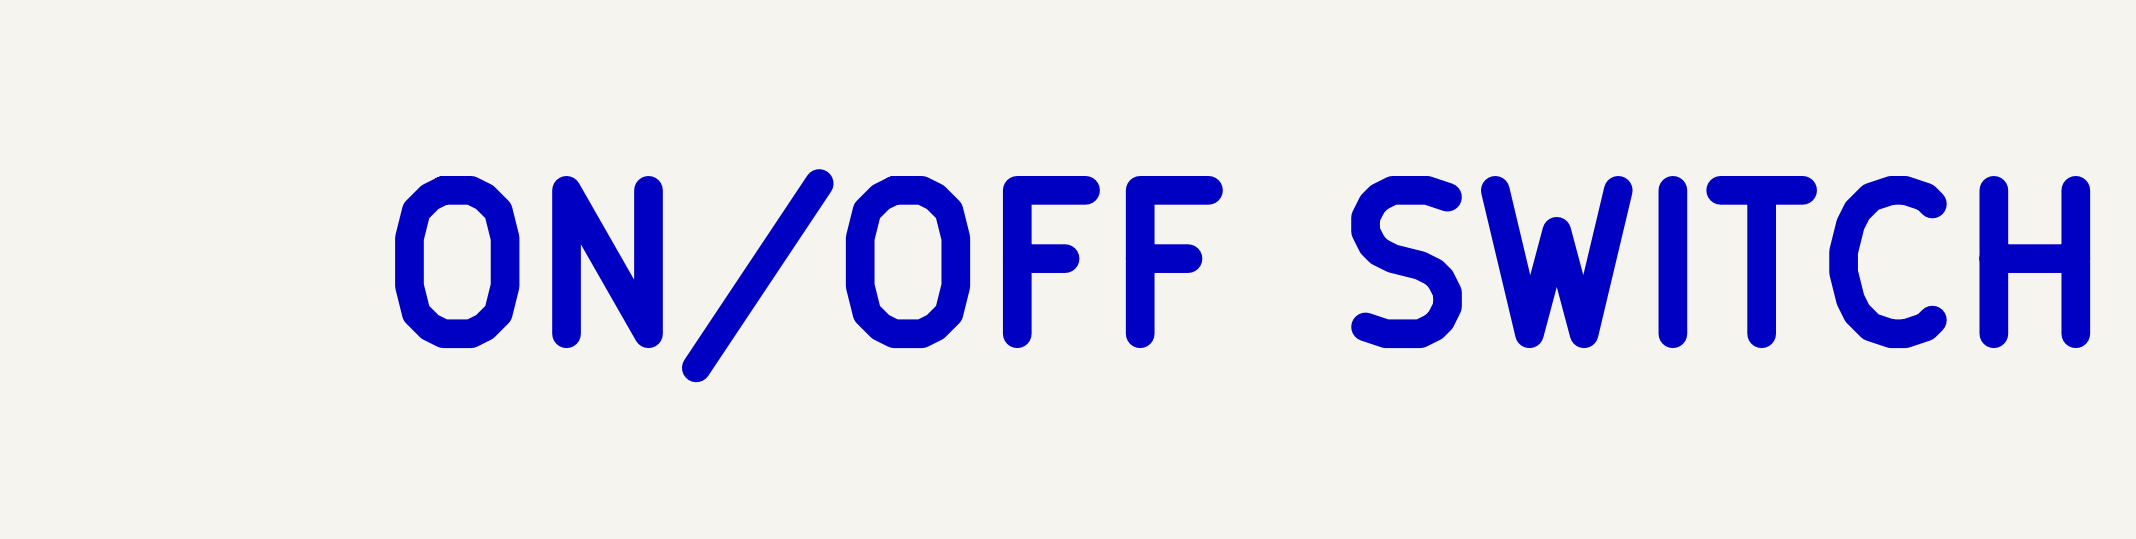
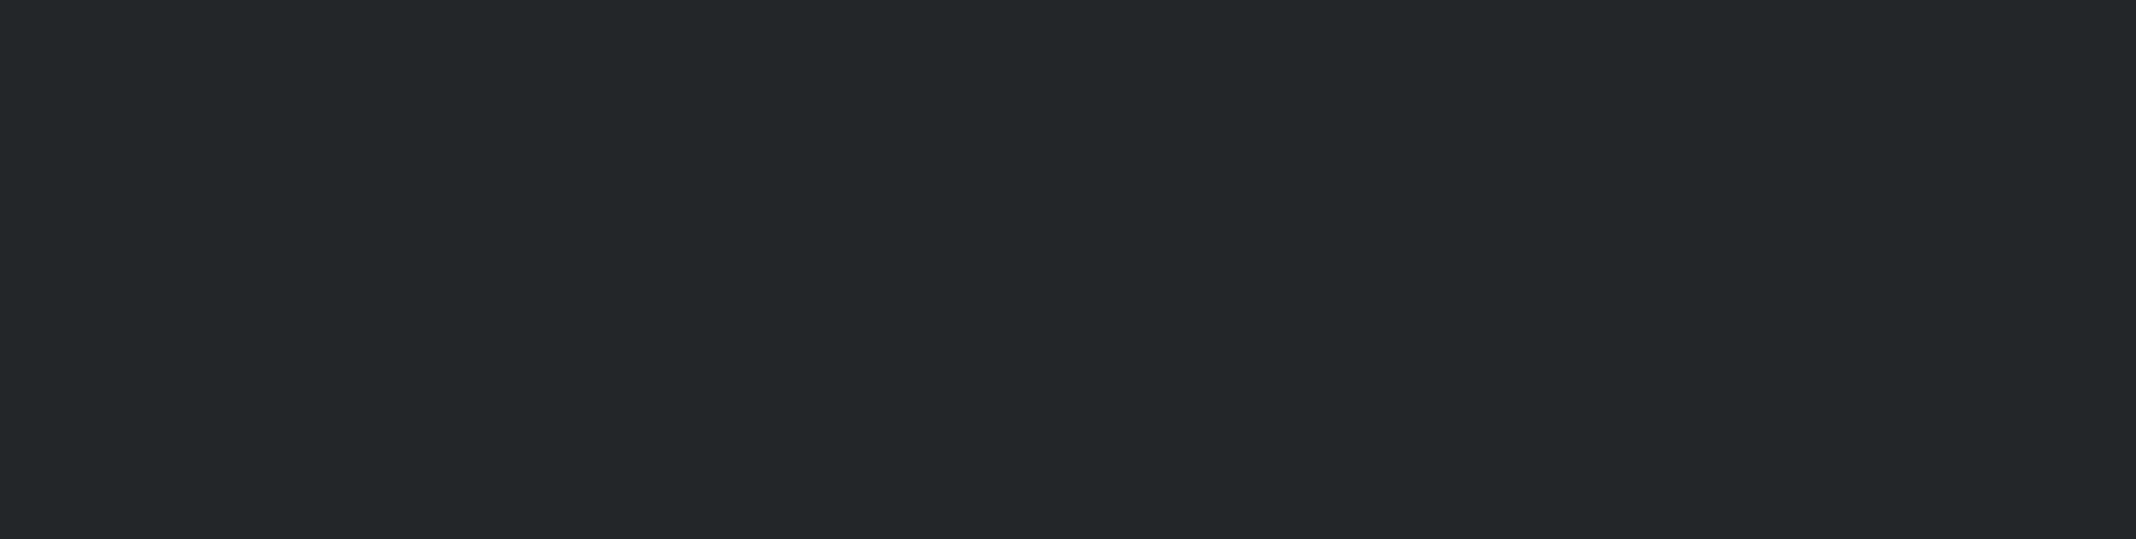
text: ON/OFF SWITCH (1242, 275) -> none

